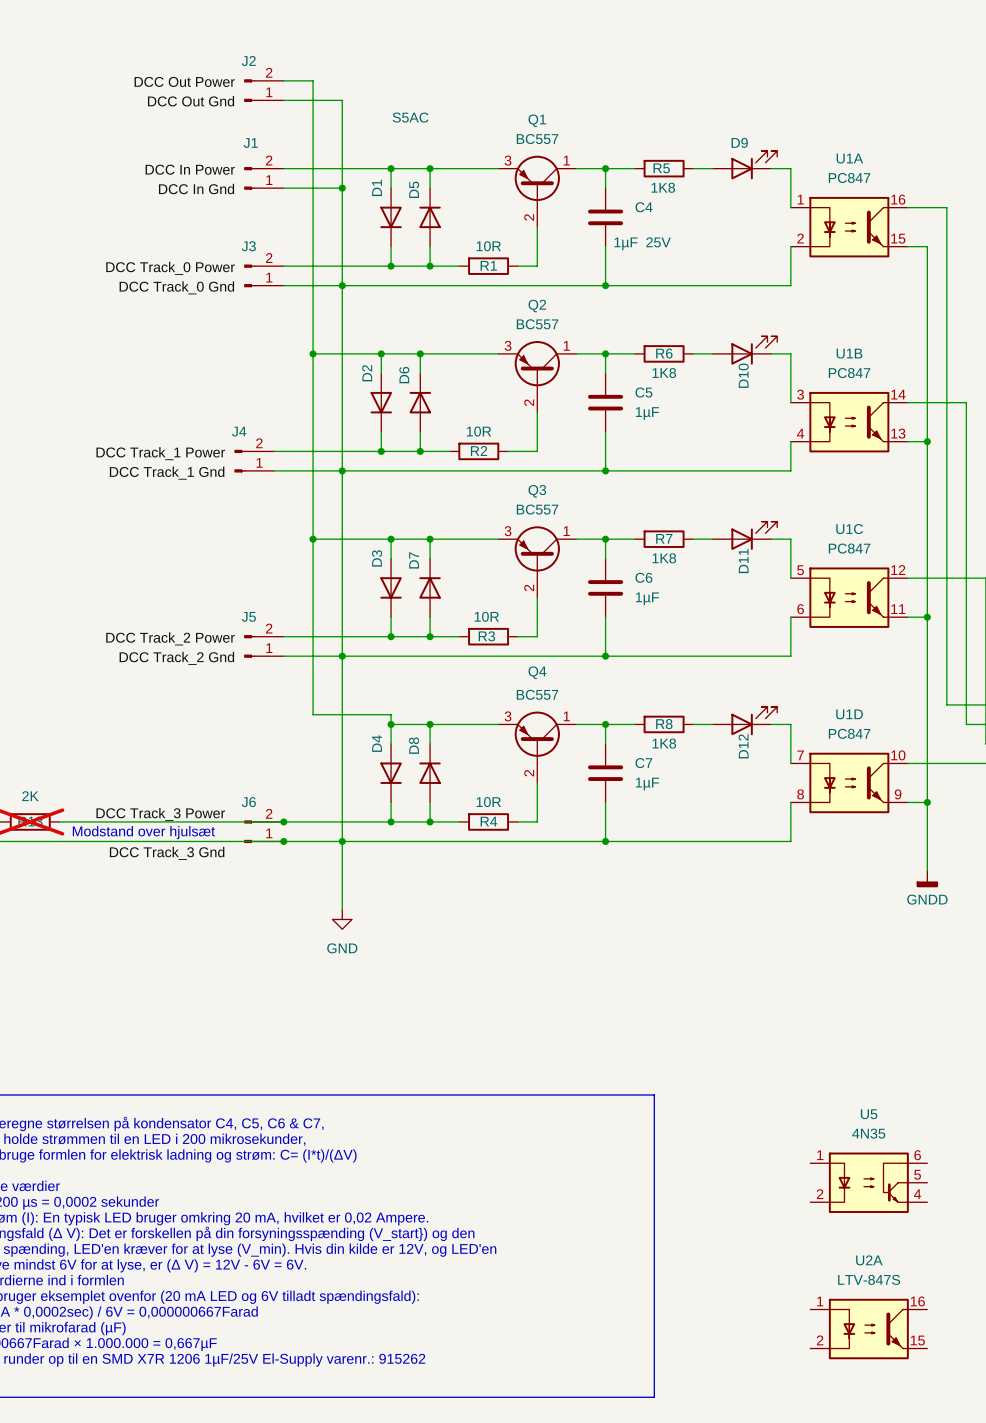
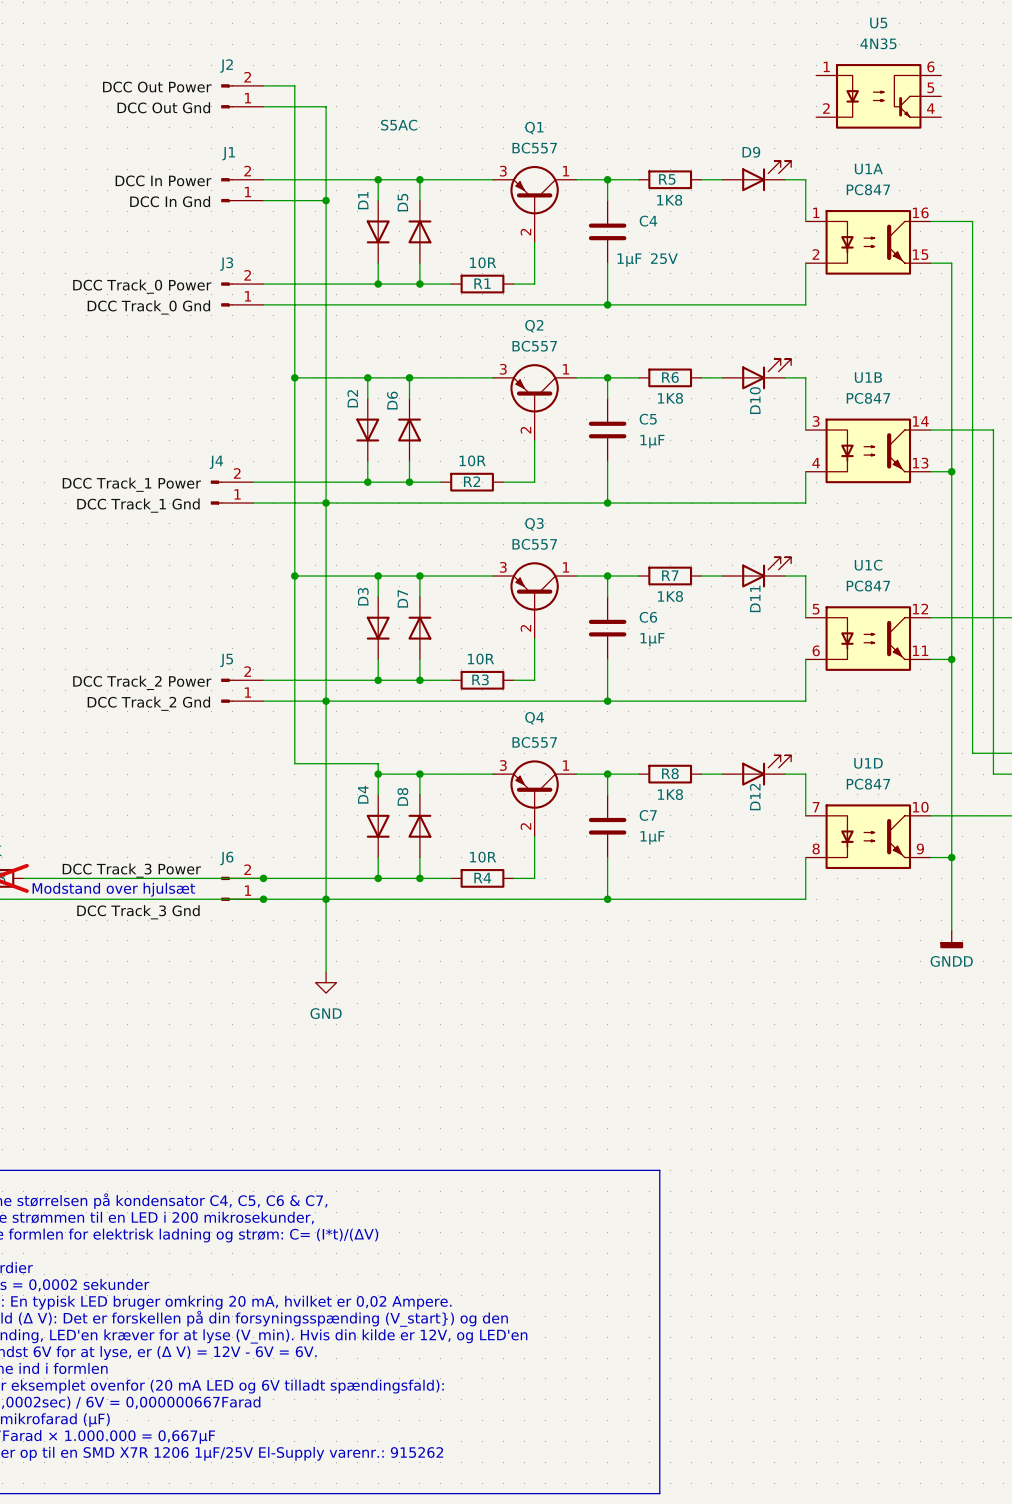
junction: (342, 285) -> none
U5 position: (868, 1182) -> (878, 96)
U2A: LTV-847S (868, 1329) -> none

